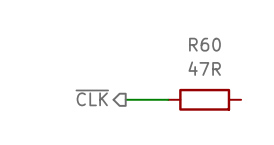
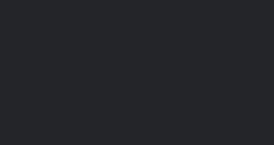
hierarchical label: ~{CLK} (92, 97) -> none
wire: (125, 99) (168, 99) -> none
R60: 47R (204, 99) -> none

